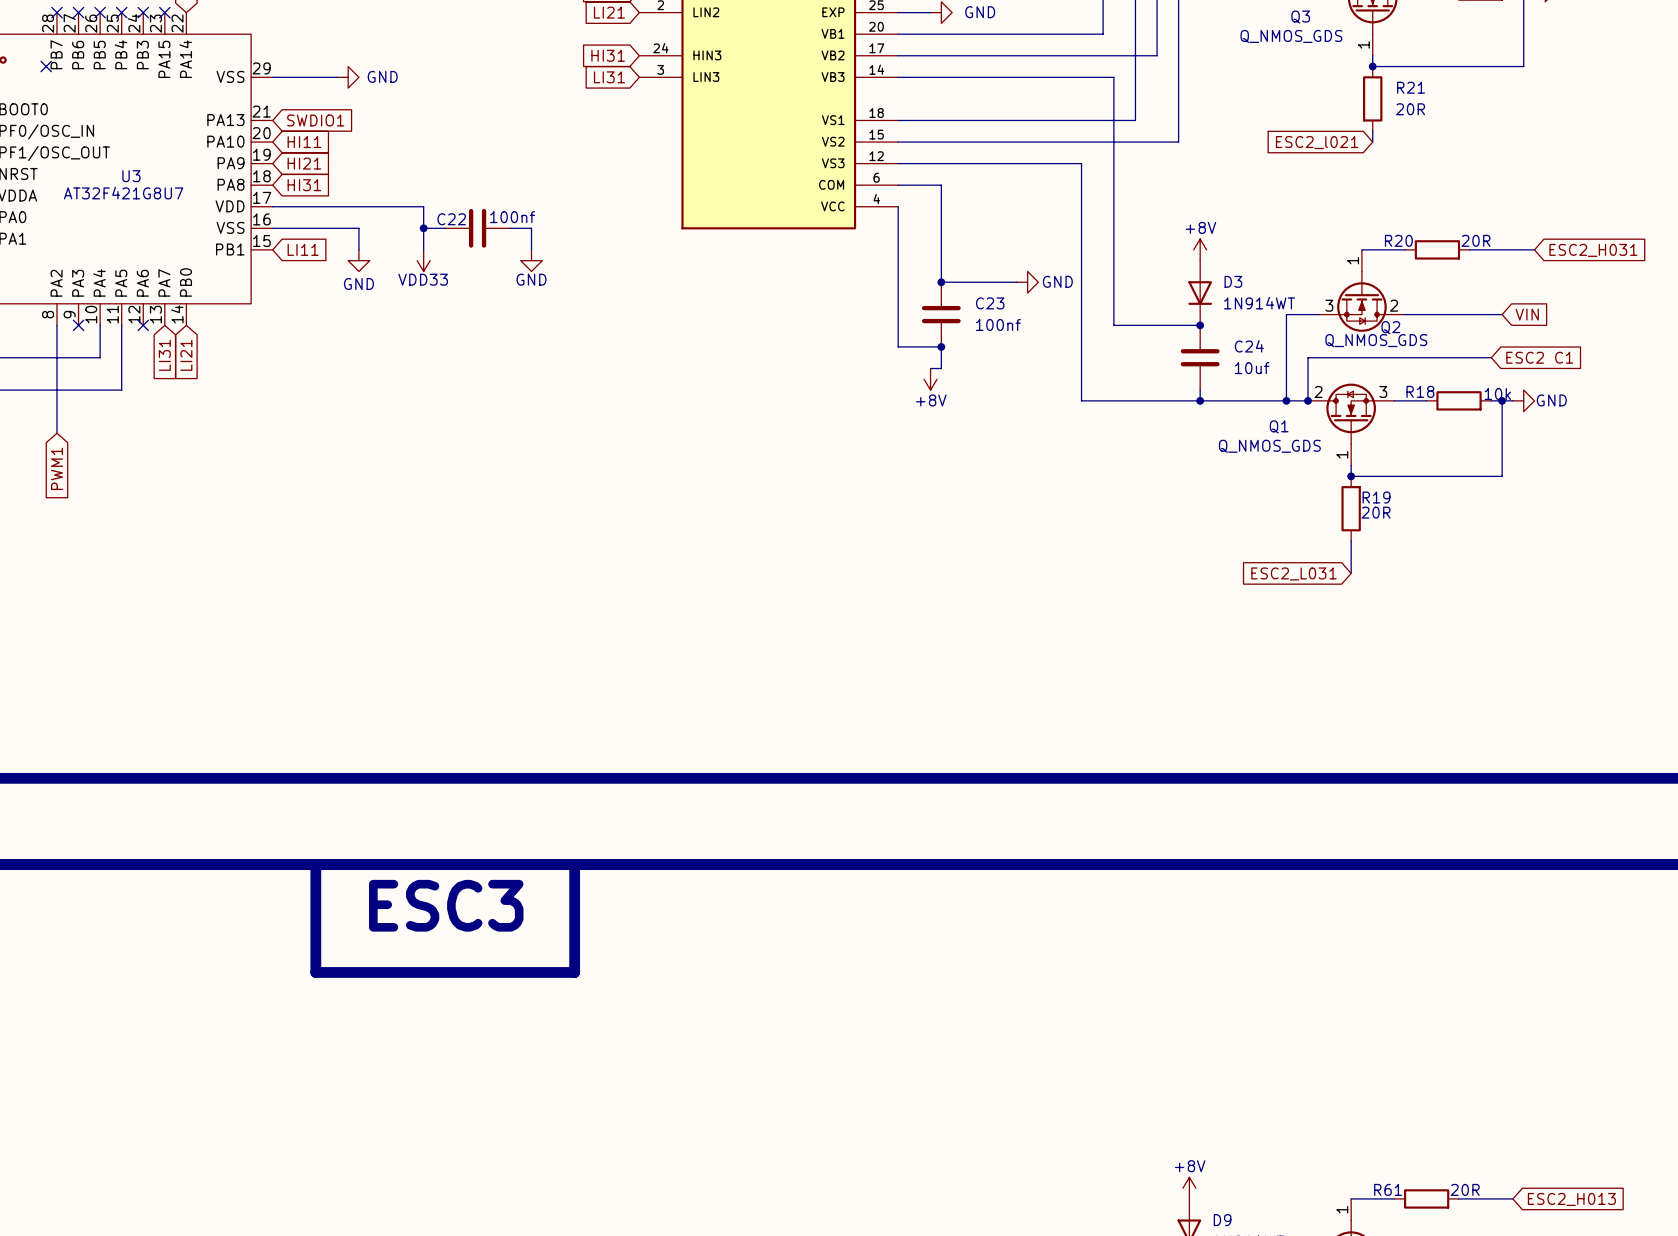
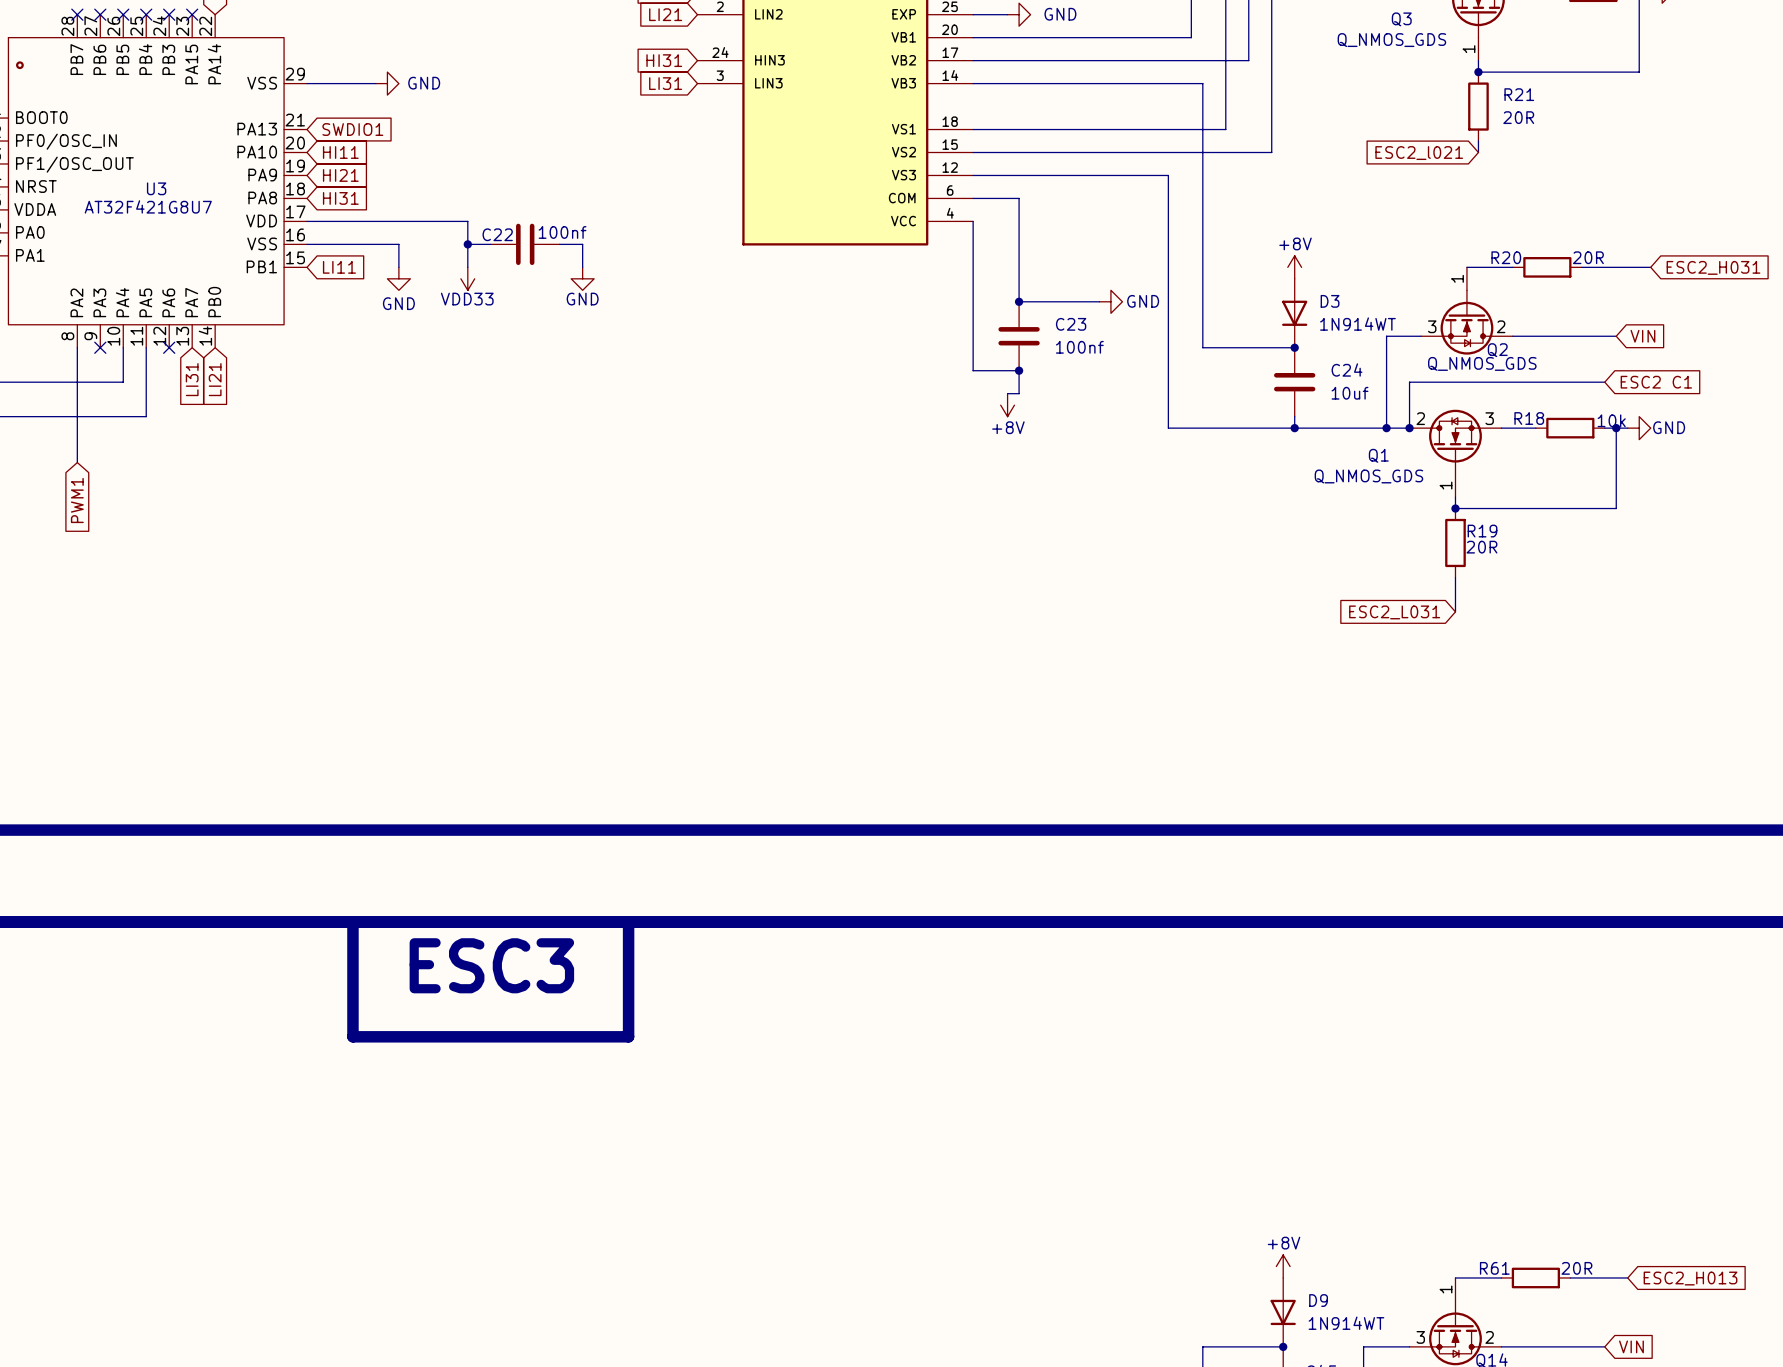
no-connect mark: (46, 66) -> none

